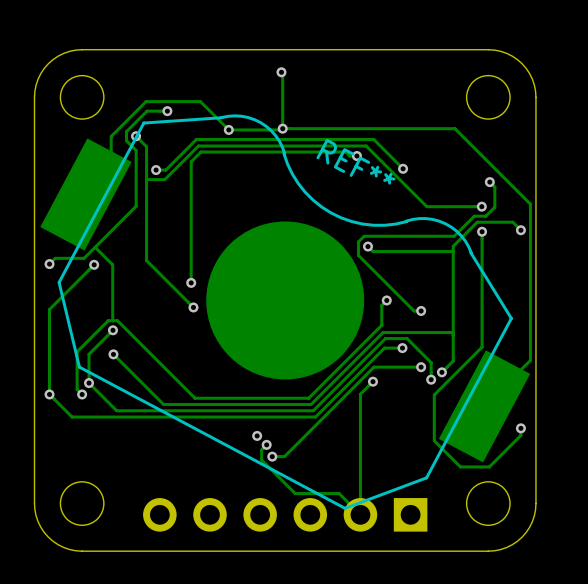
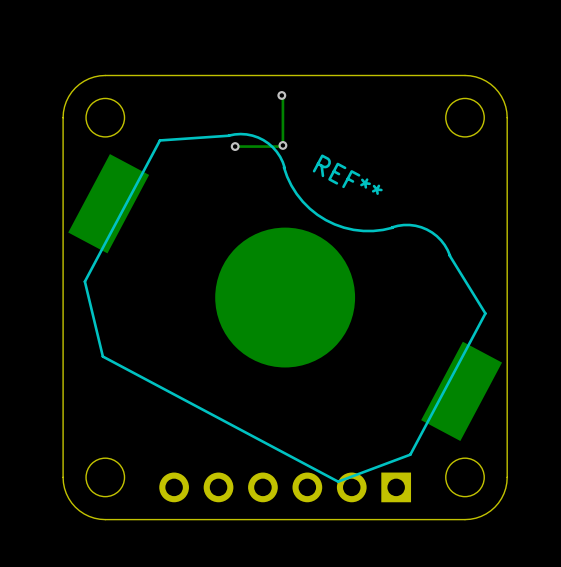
track: (167, 111) (147, 111) (126, 131) (126, 140) (136, 150) (136, 206) (84, 258) (55, 258) (49, 264) -> none
via: (167, 111) -> none
track: (282, 128) (454, 128) (530, 204) (530, 360) (484, 406) -> none
track: (228, 129) (200, 101) (146, 101) (111, 136) (111, 169) (85, 194) -> none
track: (136, 136) (146, 146) (146, 260) (193, 307) -> none
via: (136, 136) -> none
track: (356, 156) (349, 156) (345, 152) (200, 152) (191, 161) (191, 282) -> none
via: (356, 156) -> none
track: (403, 168) (373, 139) (196, 139) (165, 170) (156, 170) -> none
via: (403, 168) -> none
via: (156, 170) -> none
track: (146, 179) (164, 179) (198, 145) (366, 145) (426, 206) (481, 206) -> none
track: (489, 182) (494, 187) (494, 207) (485, 216) (474, 216) (454, 236) (364, 236) (358, 241) (358, 255) (414, 310) (421, 310) -> none
via: (489, 182) -> none
via: (481, 206) -> none
track: (520, 230) (512, 222) (477, 222) (453, 246) (453, 361) (441, 372) -> none
via: (520, 230) -> none
track: (482, 231) (482, 347) (434, 394) (434, 440) (460, 466) (489, 466) (520, 435) (520, 428) -> none
via: (482, 231) -> none
track: (367, 246) (372, 251) (453, 251) -> none
via: (367, 246) -> none
track: (95, 247) (112, 264) (112, 320) -> none
via: (49, 264) -> none
track: (94, 264) (49, 309) (49, 394) (72, 417) (315, 417) (384, 348) (402, 348) -> none
via: (94, 264) -> none
via: (191, 282) -> none
track: (386, 300) (381, 305) (381, 325) (308, 398) (195, 398) (117, 320) (108, 320) (77, 351) (77, 389) (82, 394) -> none
via: (386, 300) -> none
via: (193, 307) -> none
via: (421, 310) -> none
track: (112, 330) (89, 354) (89, 383) (116, 410) (313, 410) (385, 338) (407, 338) (431, 362) (431, 379) -> none
via: (112, 330) -> none
track: (453, 333) (383, 332) (311, 404) (163, 404) (113, 354) -> none
via: (402, 348) -> none
via: (113, 354) -> none
track: (421, 367) (373, 367) (284, 456) (272, 456) -> none
via: (421, 367) -> none
via: (441, 372) -> none
via: (431, 379) -> none
track: (372, 381) (360, 394) (360, 514) (339, 493) (295, 493) (261, 459) (261, 449) (266, 444) -> none
via: (372, 381) -> none
via: (89, 383) -> none
via: (49, 394) -> none
via: (82, 394) -> none
via: (520, 428) -> none
via: (257, 435) -> none
via: (266, 444) -> none
via: (272, 456) -> none

